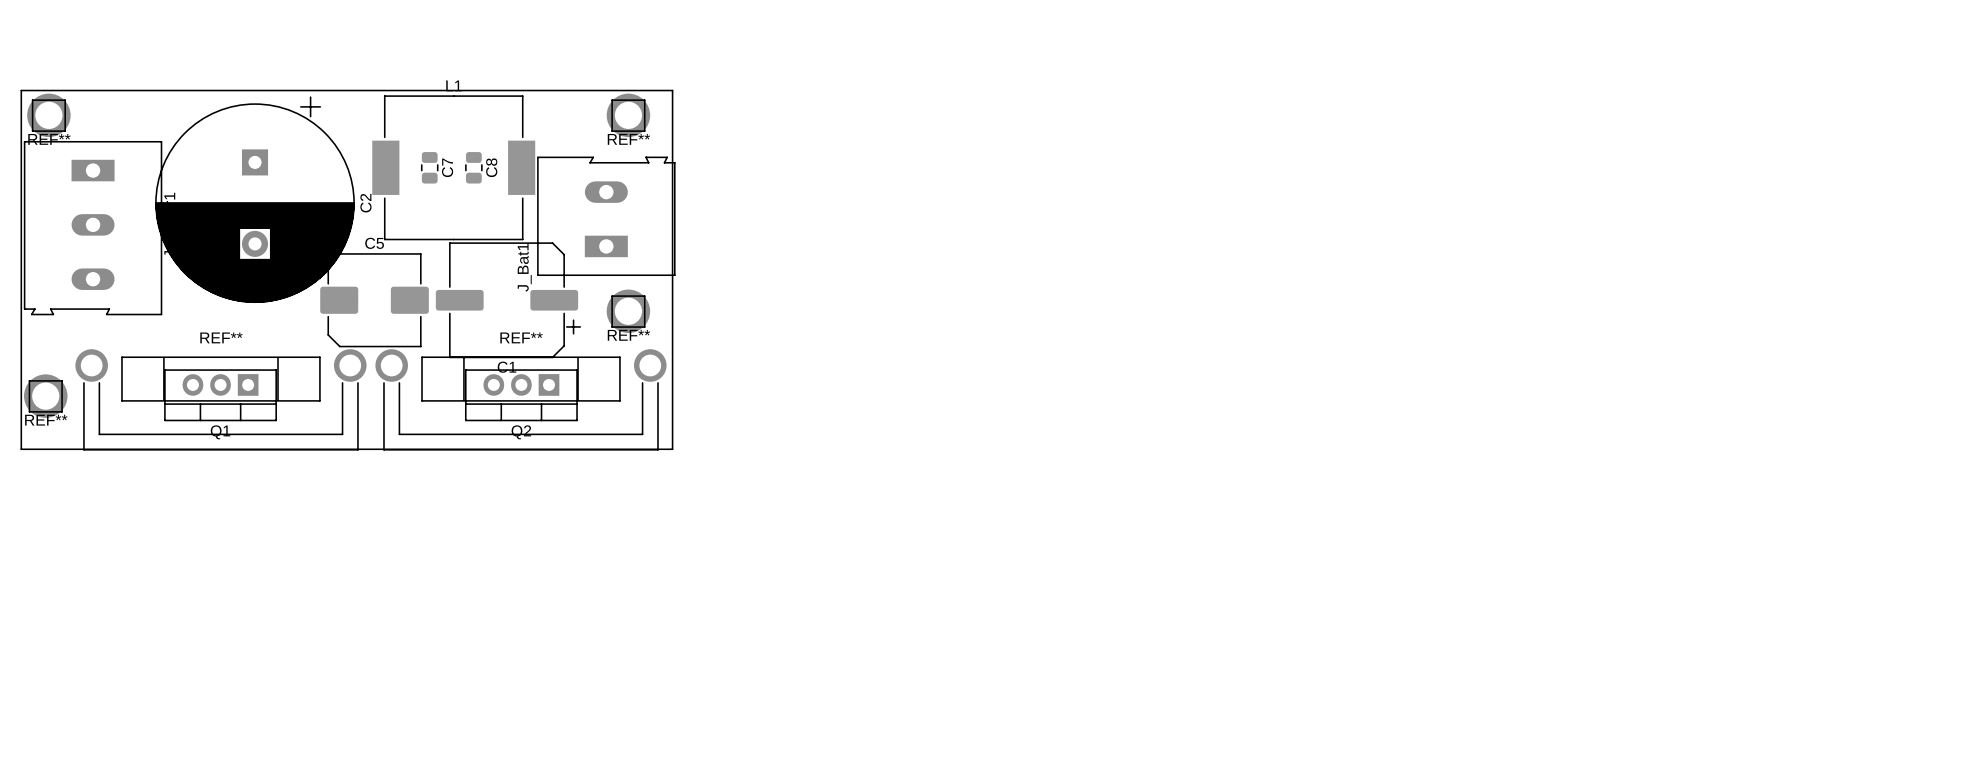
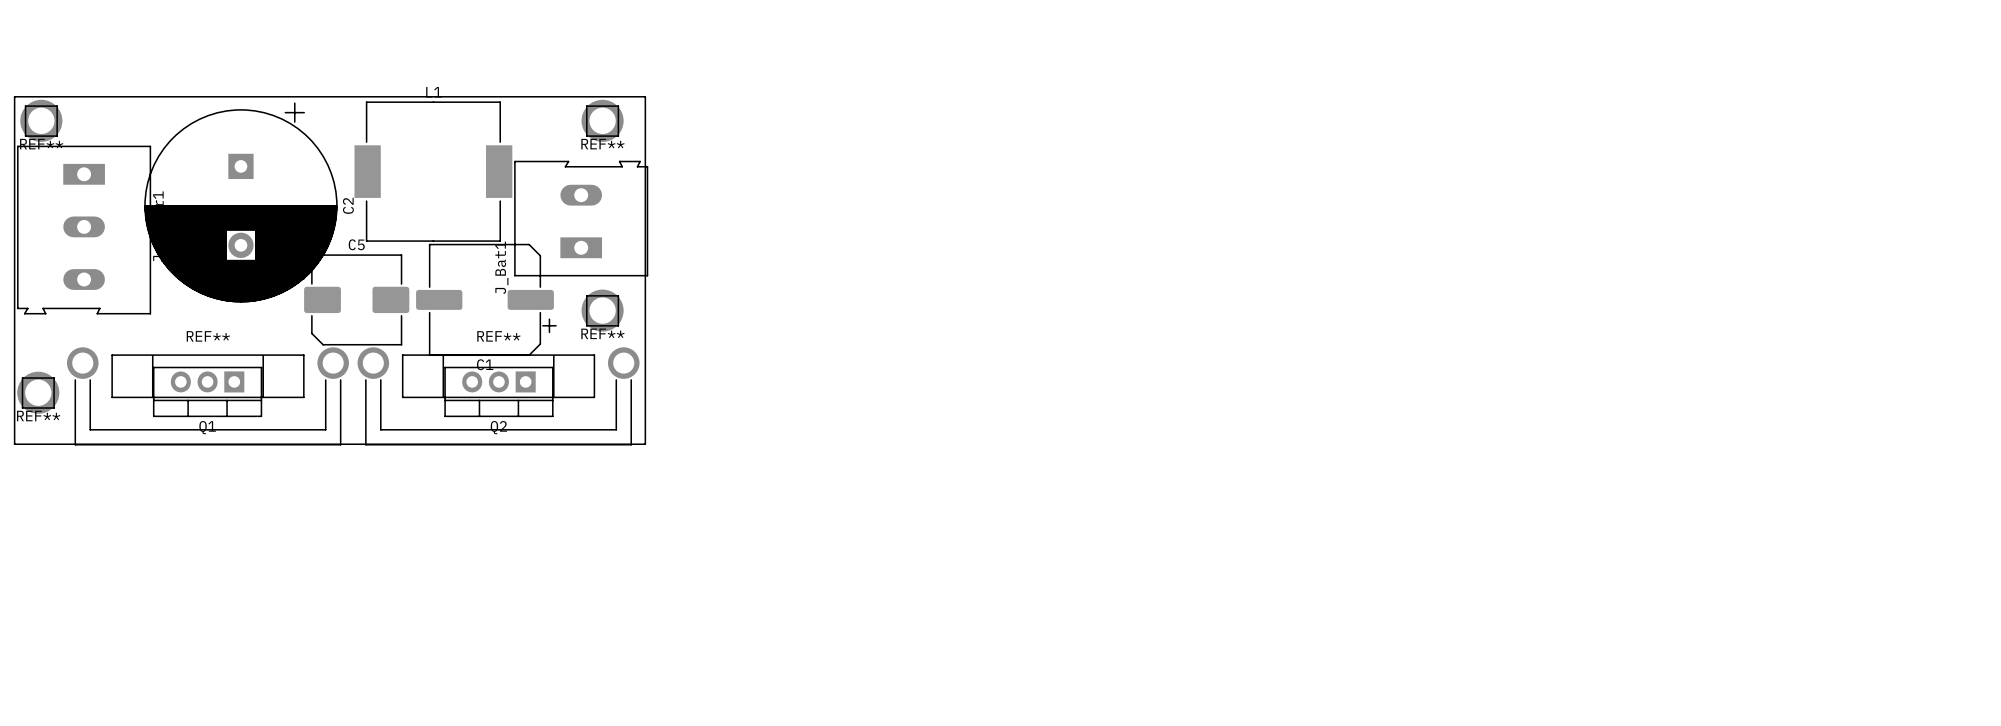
C7: (429, 167) -> none
C8: (473, 167) -> none

